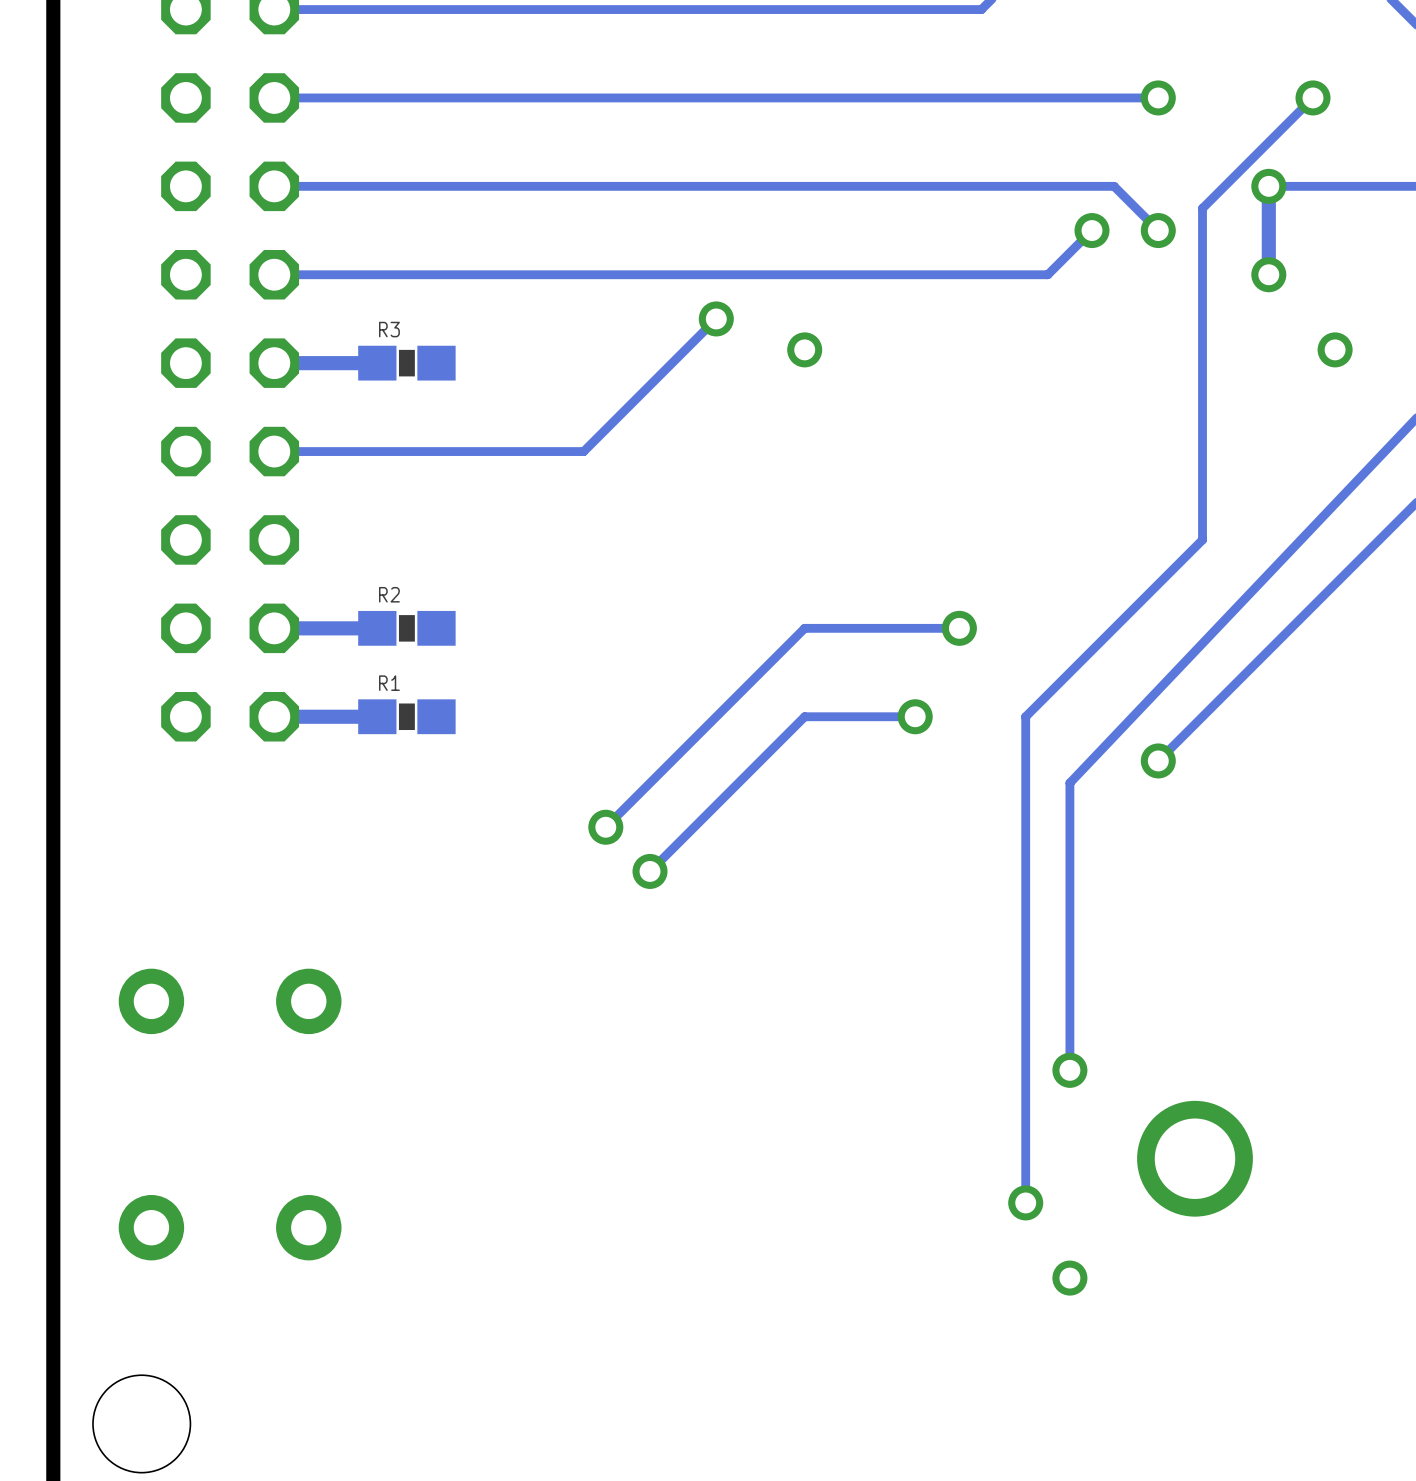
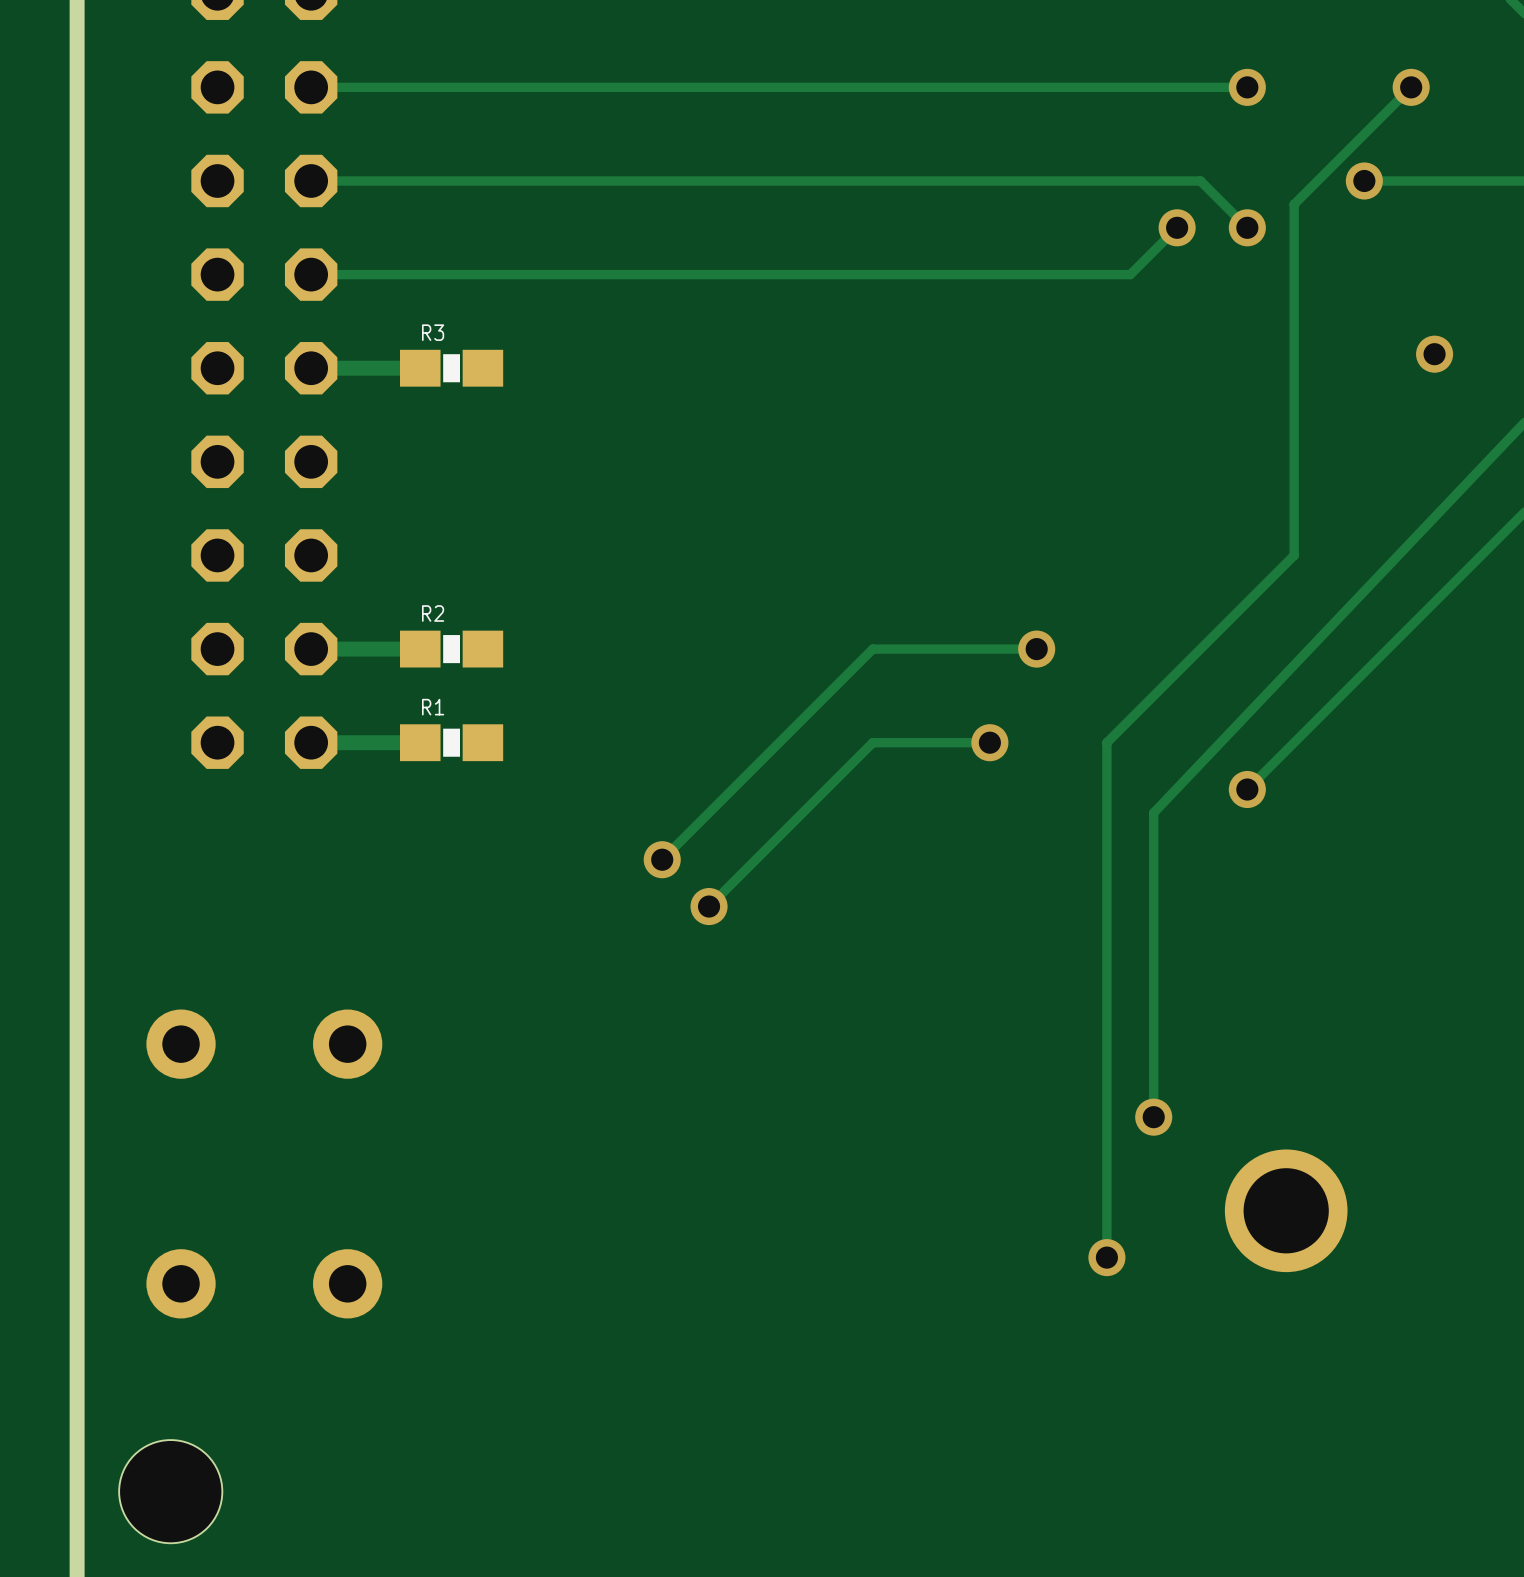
track: (1268, 186) (1268, 274) -> none
via: (1268, 274) -> none
track: (716, 318) (583, 451) (274, 451) -> none
via: (716, 318) -> none
via: (804, 349) -> none
via: (1069, 1278) -> none

